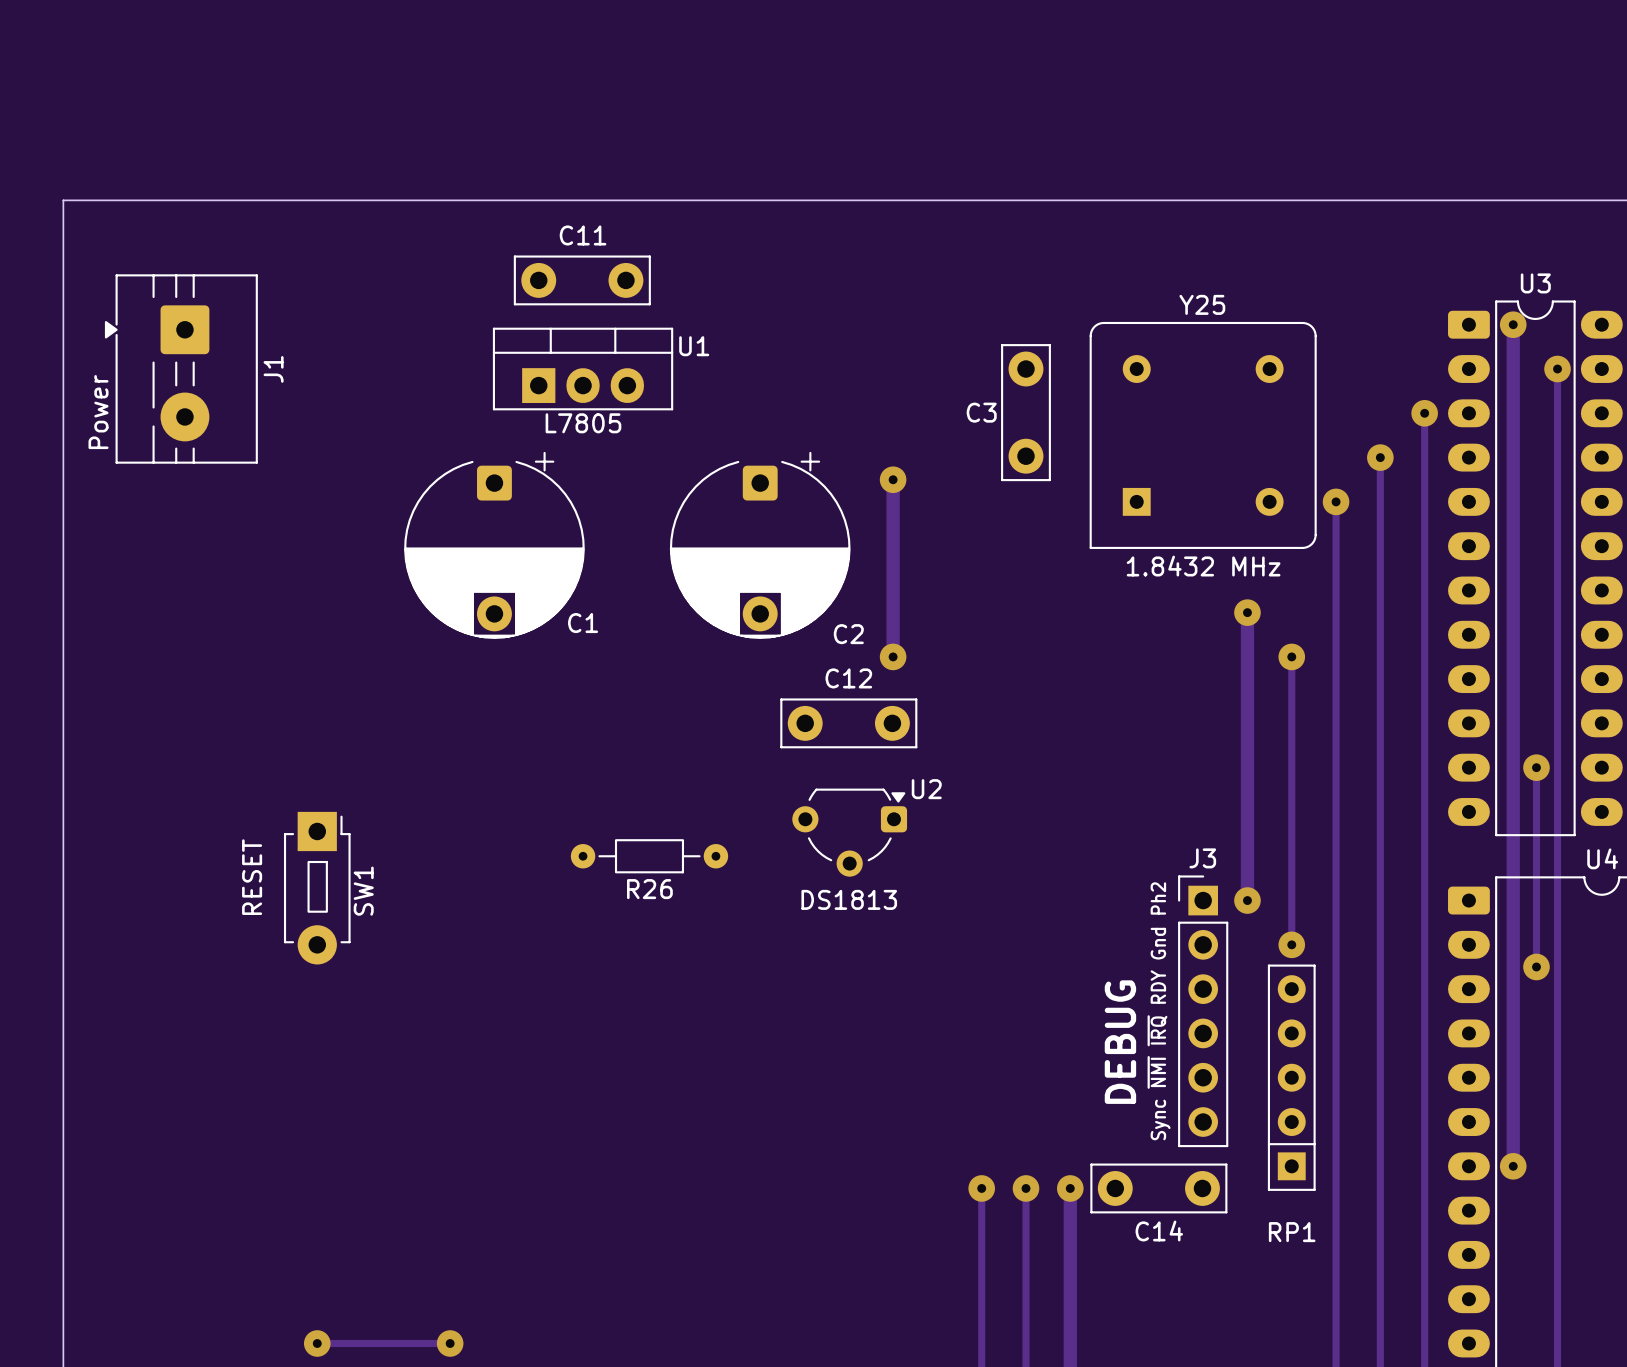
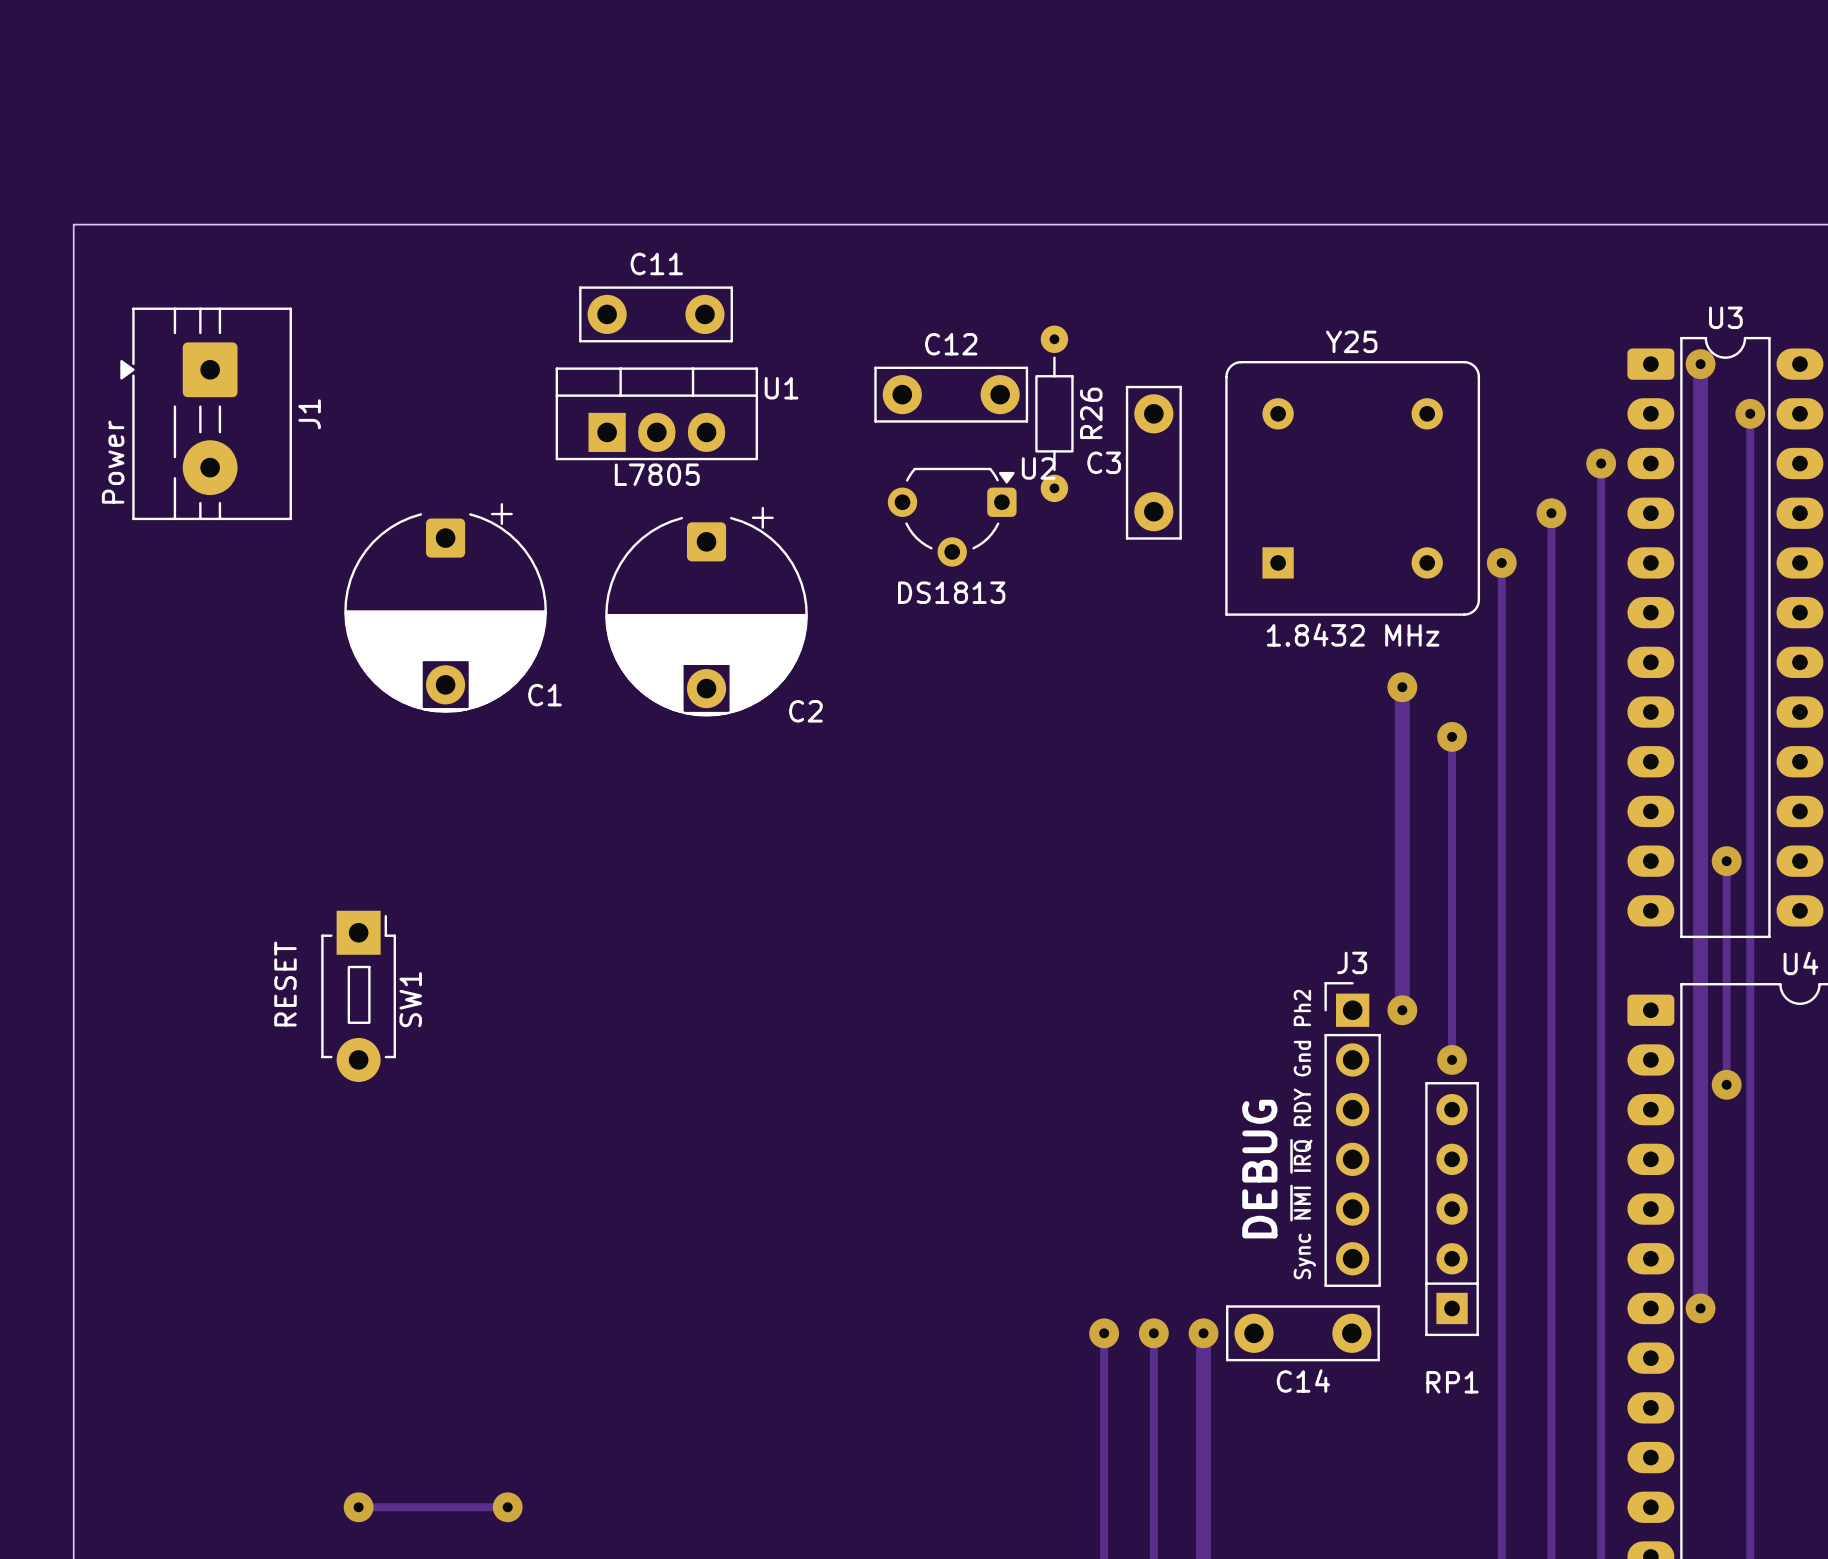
track: (893, 479) (893, 656) -> none
via: (893, 479) -> none
C1 position: (494, 545) -> (445, 607)
C2 position: (760, 545) -> (706, 611)
via: (893, 656) -> none
C12 position: (848, 723) -> (951, 394)
U2 position: (849, 832) -> (952, 517)
R26 rotation: 0° (649, 856) -> 90° clockwise (1054, 413)
R26 position: (649, 856) -> (1054, 413)
R26 name position: R26 (649, 889) -> R26 (1091, 413)

